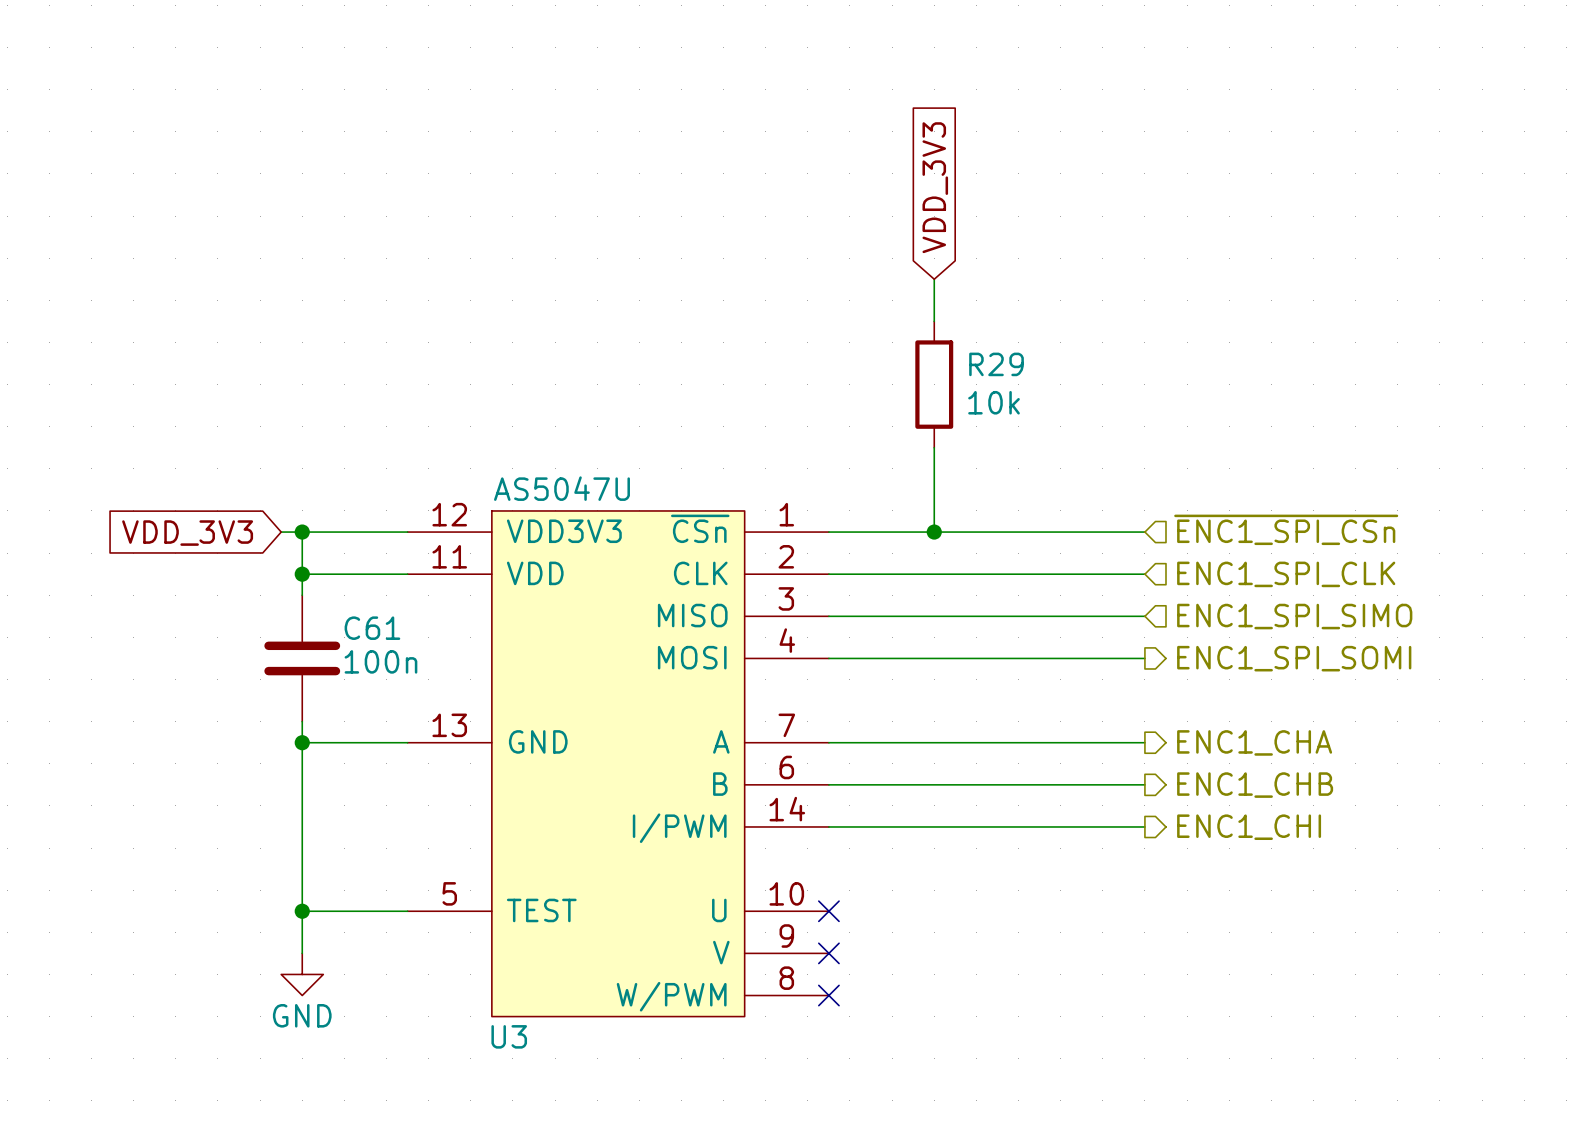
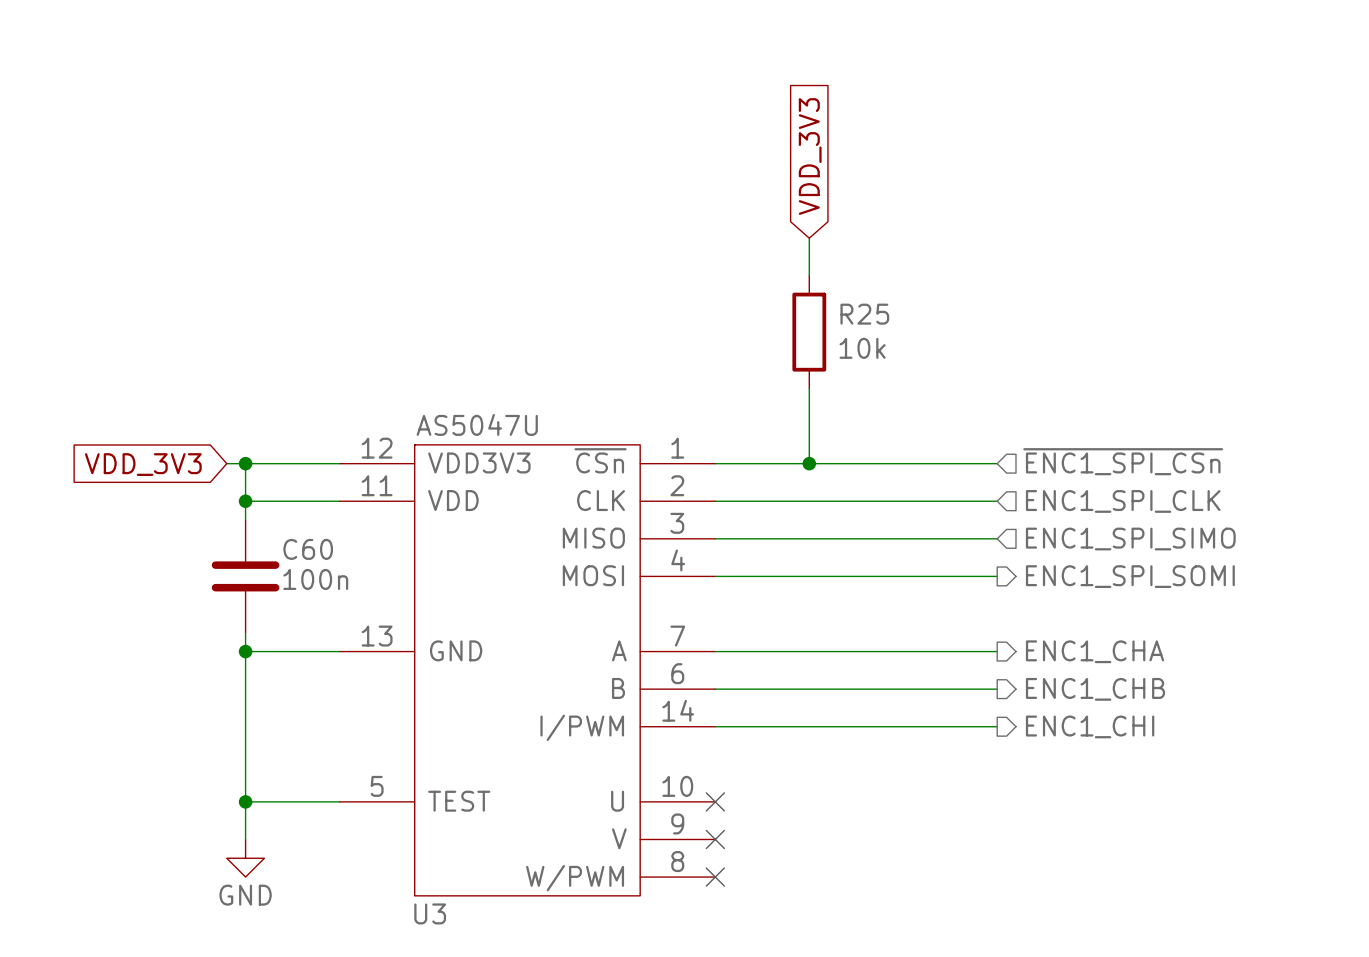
R29 name: R29 (996, 364) -> R25 (864, 314)
C61 name: C61 (372, 628) -> C60 (308, 549)

